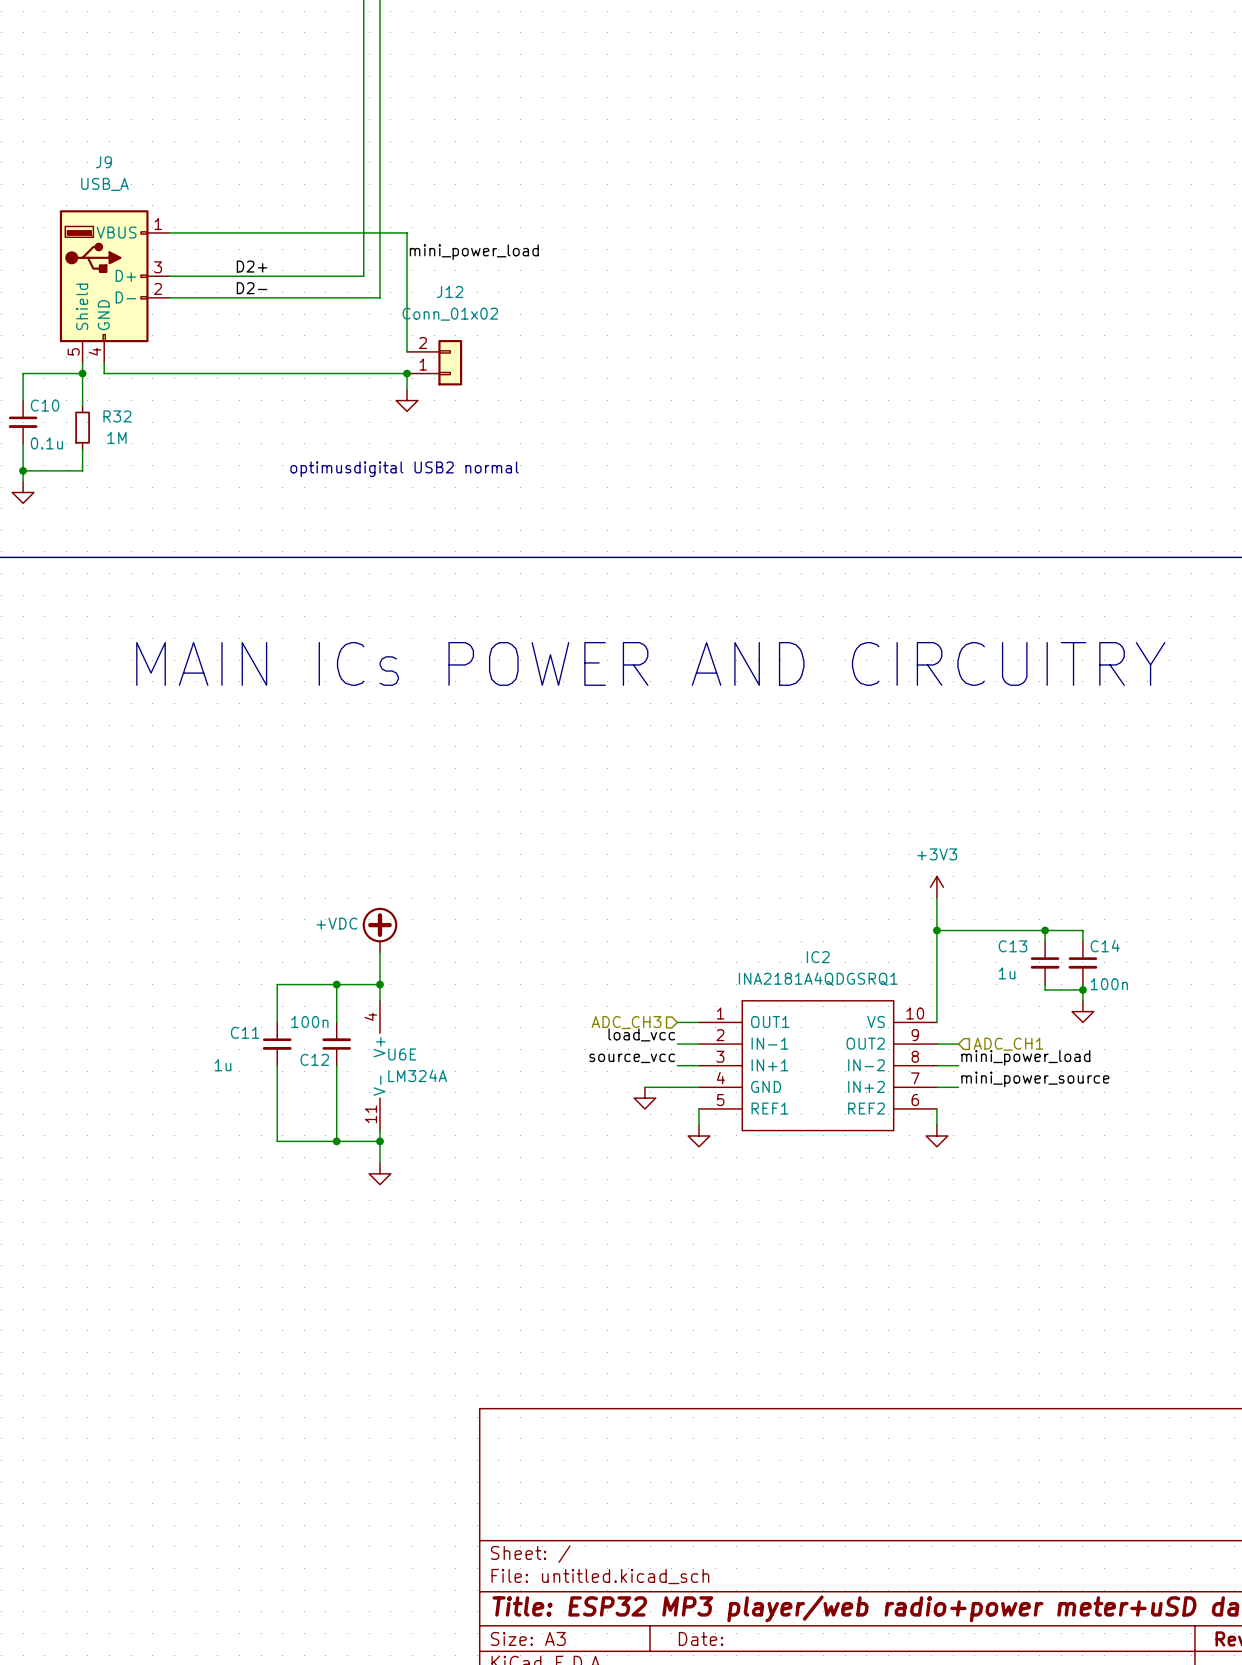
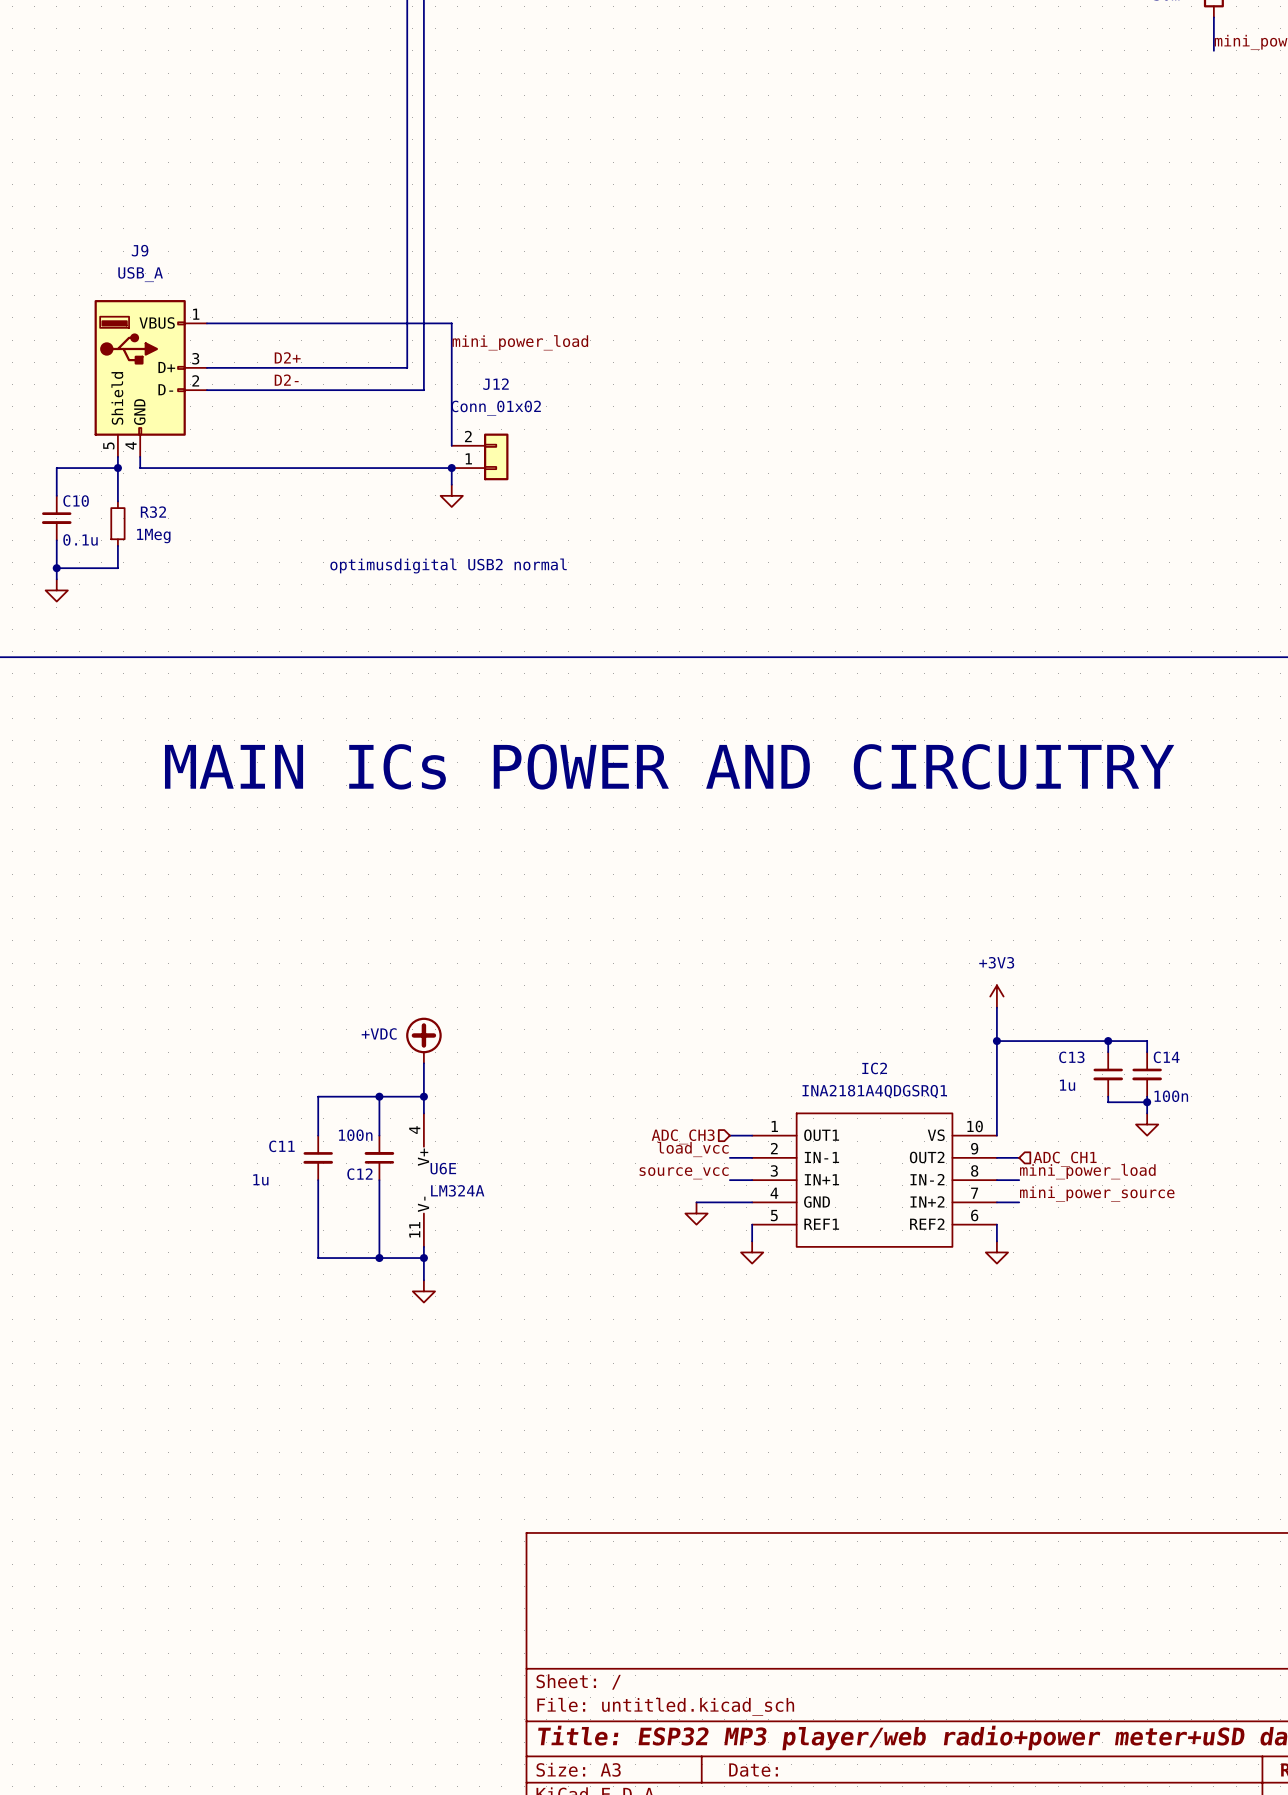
R32 value: 1M (116, 438) -> 1Meg (153, 536)

